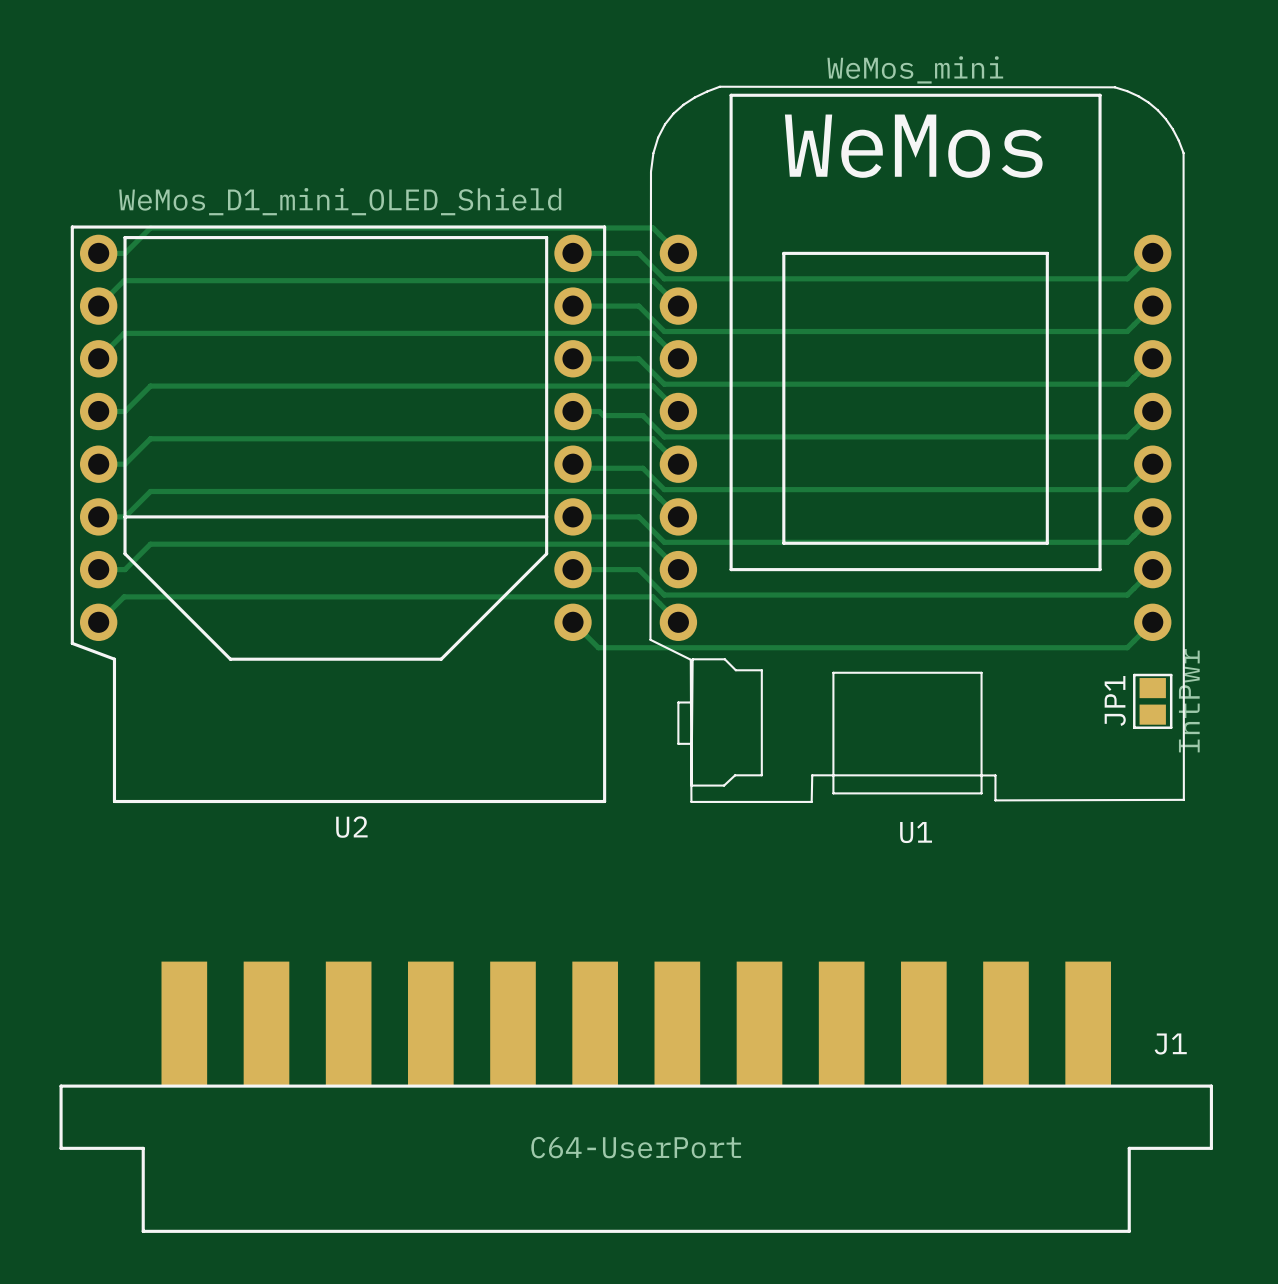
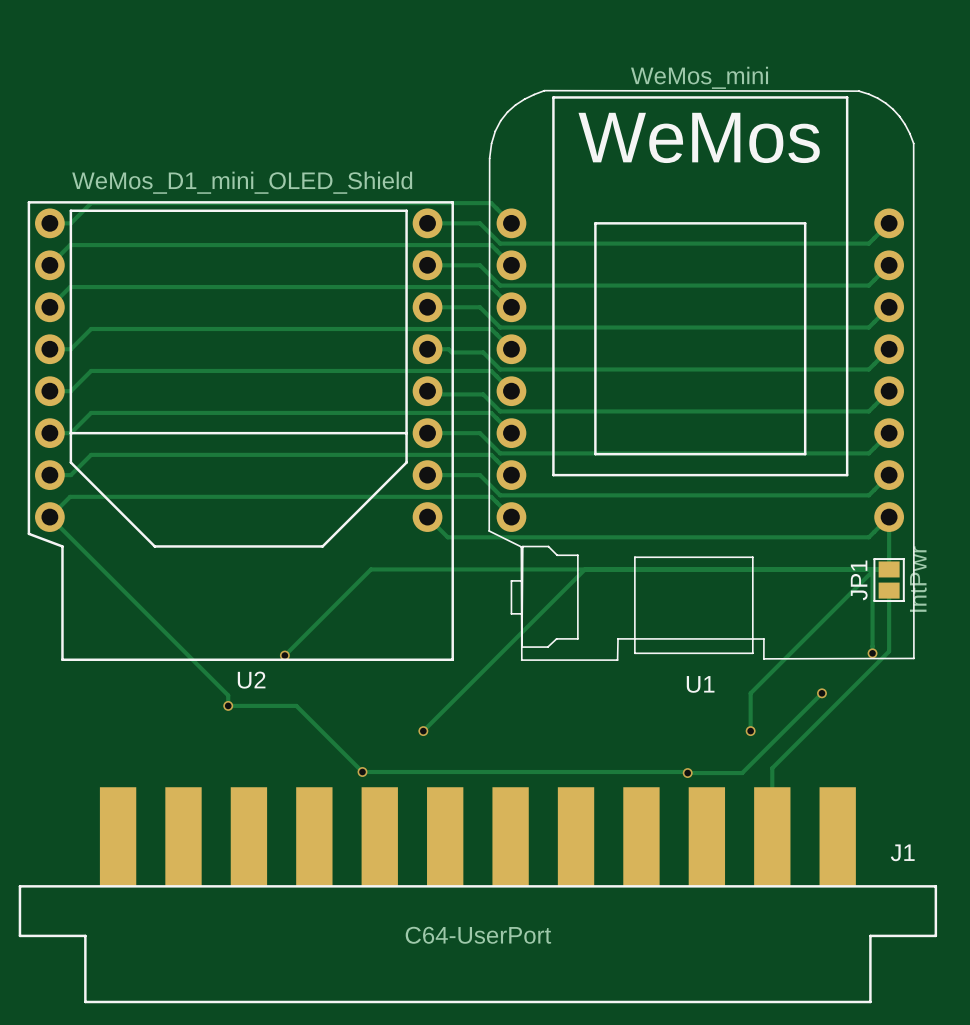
track: none -> (49, 517) (228, 695) (228, 705) (296, 705) (362, 772) (742, 773) (821, 693)
track: none -> (889, 517) (889, 569) (370, 569) (284, 655)
track: none -> (584, 569) (423, 731)
track: none -> (874, 569) (750, 693) (750, 731)
track: none -> (872, 571) (872, 653)
track: none -> (889, 590) (889, 651) (772, 768) (772, 836)
via: none -> (872, 653)
via: none -> (284, 655)
via: none -> (821, 693)
via: none -> (228, 705)
via: none -> (423, 731)
via: none -> (750, 731)
via: none -> (362, 772)
via: none -> (687, 773)

